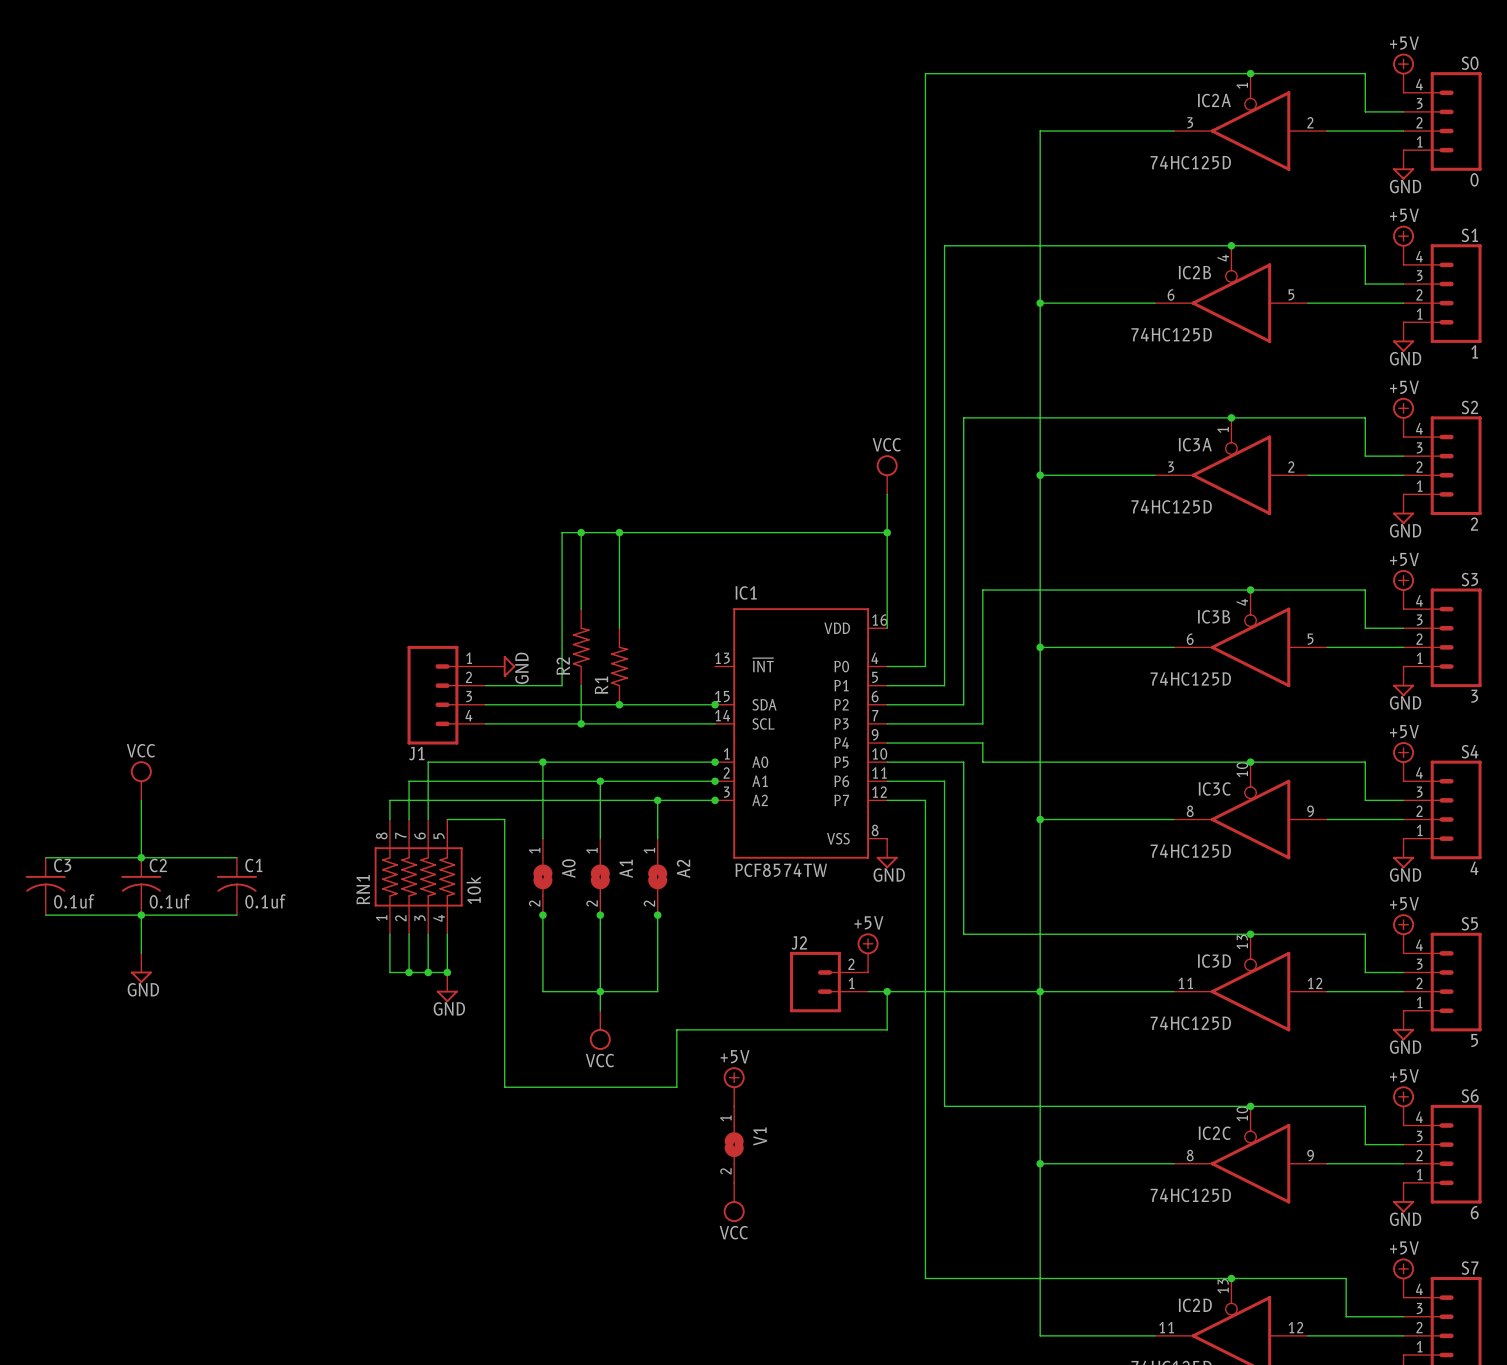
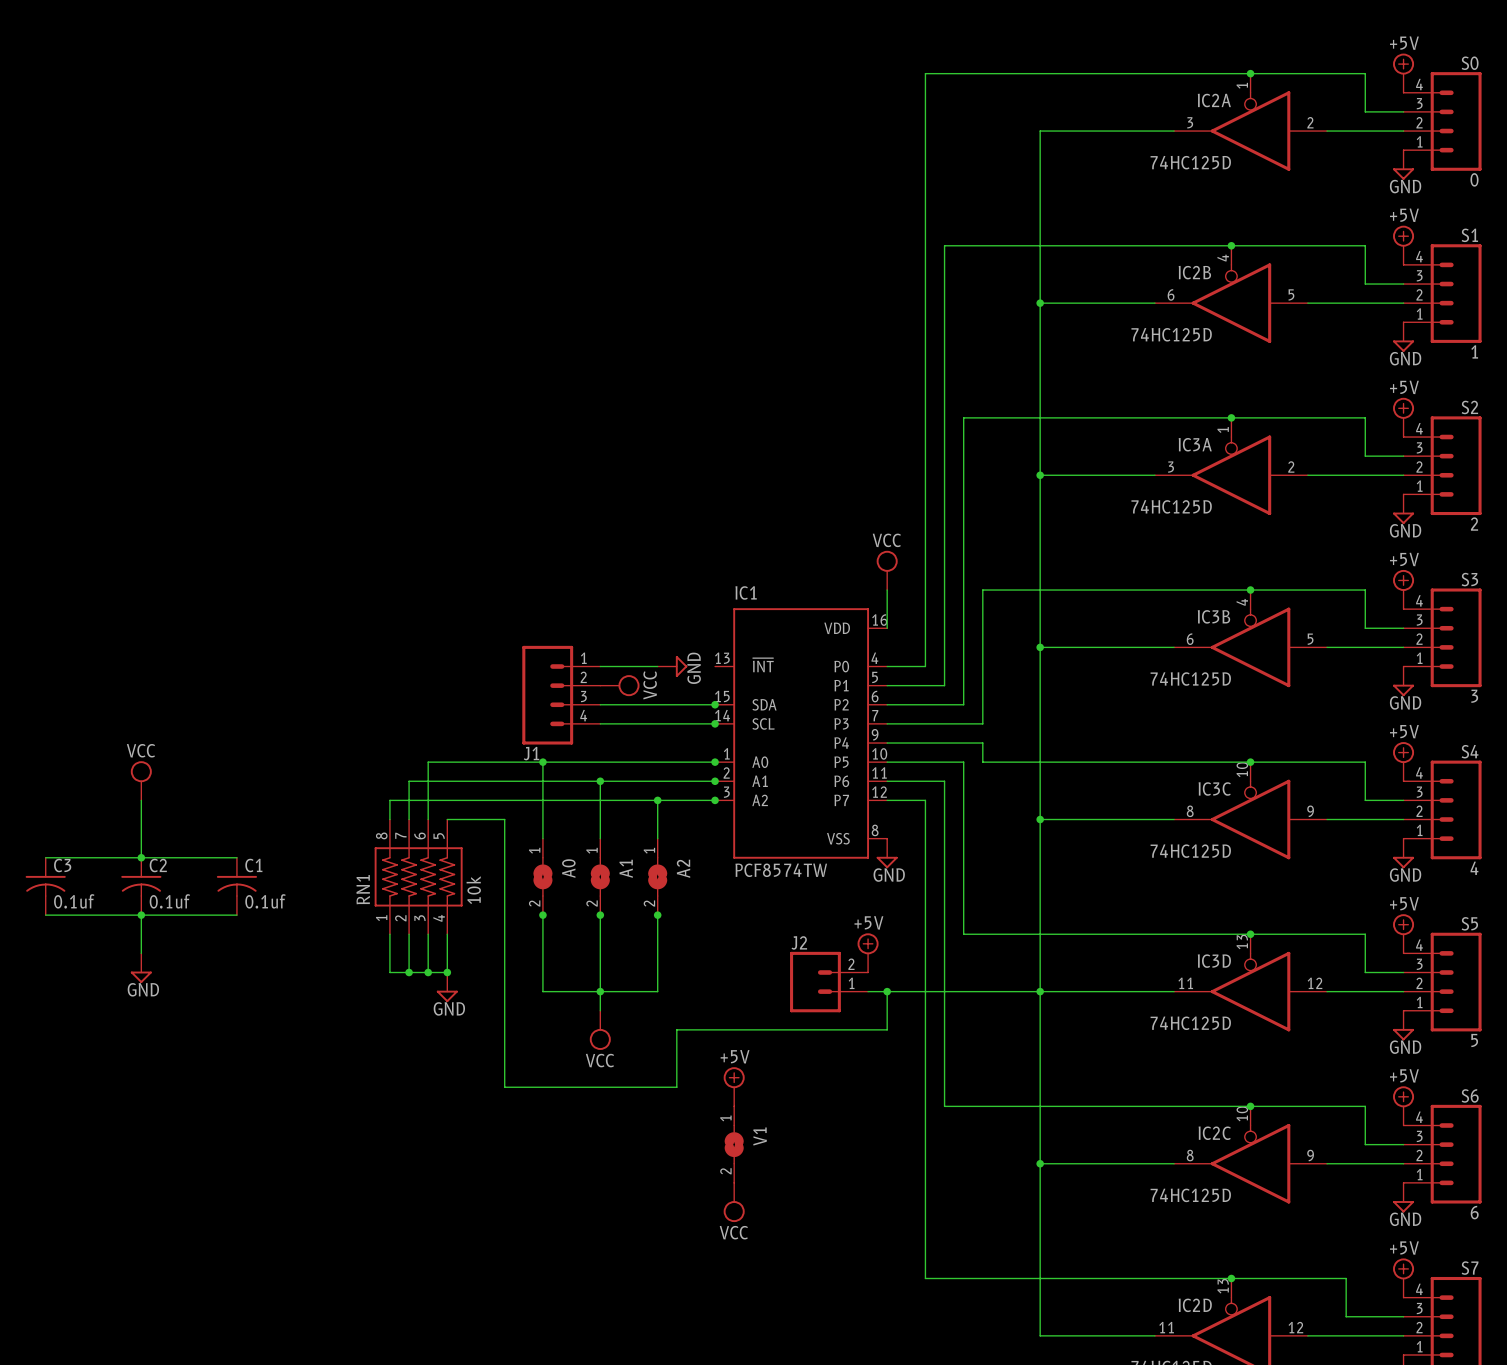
power symbol position: VCC (887, 474) -> VCC (887, 570)
wire: (887, 494) (887, 590) -> none
wire: (581, 532) (581, 609) -> none
junction: (581, 532) -> none
wire: (619, 532) (619, 628) -> none
junction: (619, 532) -> none
wire: (887, 532) (562, 532) (562, 685) (485, 685) -> none
junction: (887, 532) -> none
R2: (581, 647) -> none
power symbol position: GND (500, 666) -> GND (672, 666)
wire: none -> (600, 666) (657, 666)
R1: (619, 666) -> none
wire: (581, 685) (581, 723) -> none
power symbol: none -> VCC (619, 685)
J1 position: (446, 695) -> (561, 695)
wire: (485, 704) (600, 704) -> none
junction: (619, 704) -> none
wire: (485, 723) (600, 723) -> none
junction: (581, 723) -> none
junction: none -> (715, 723)

